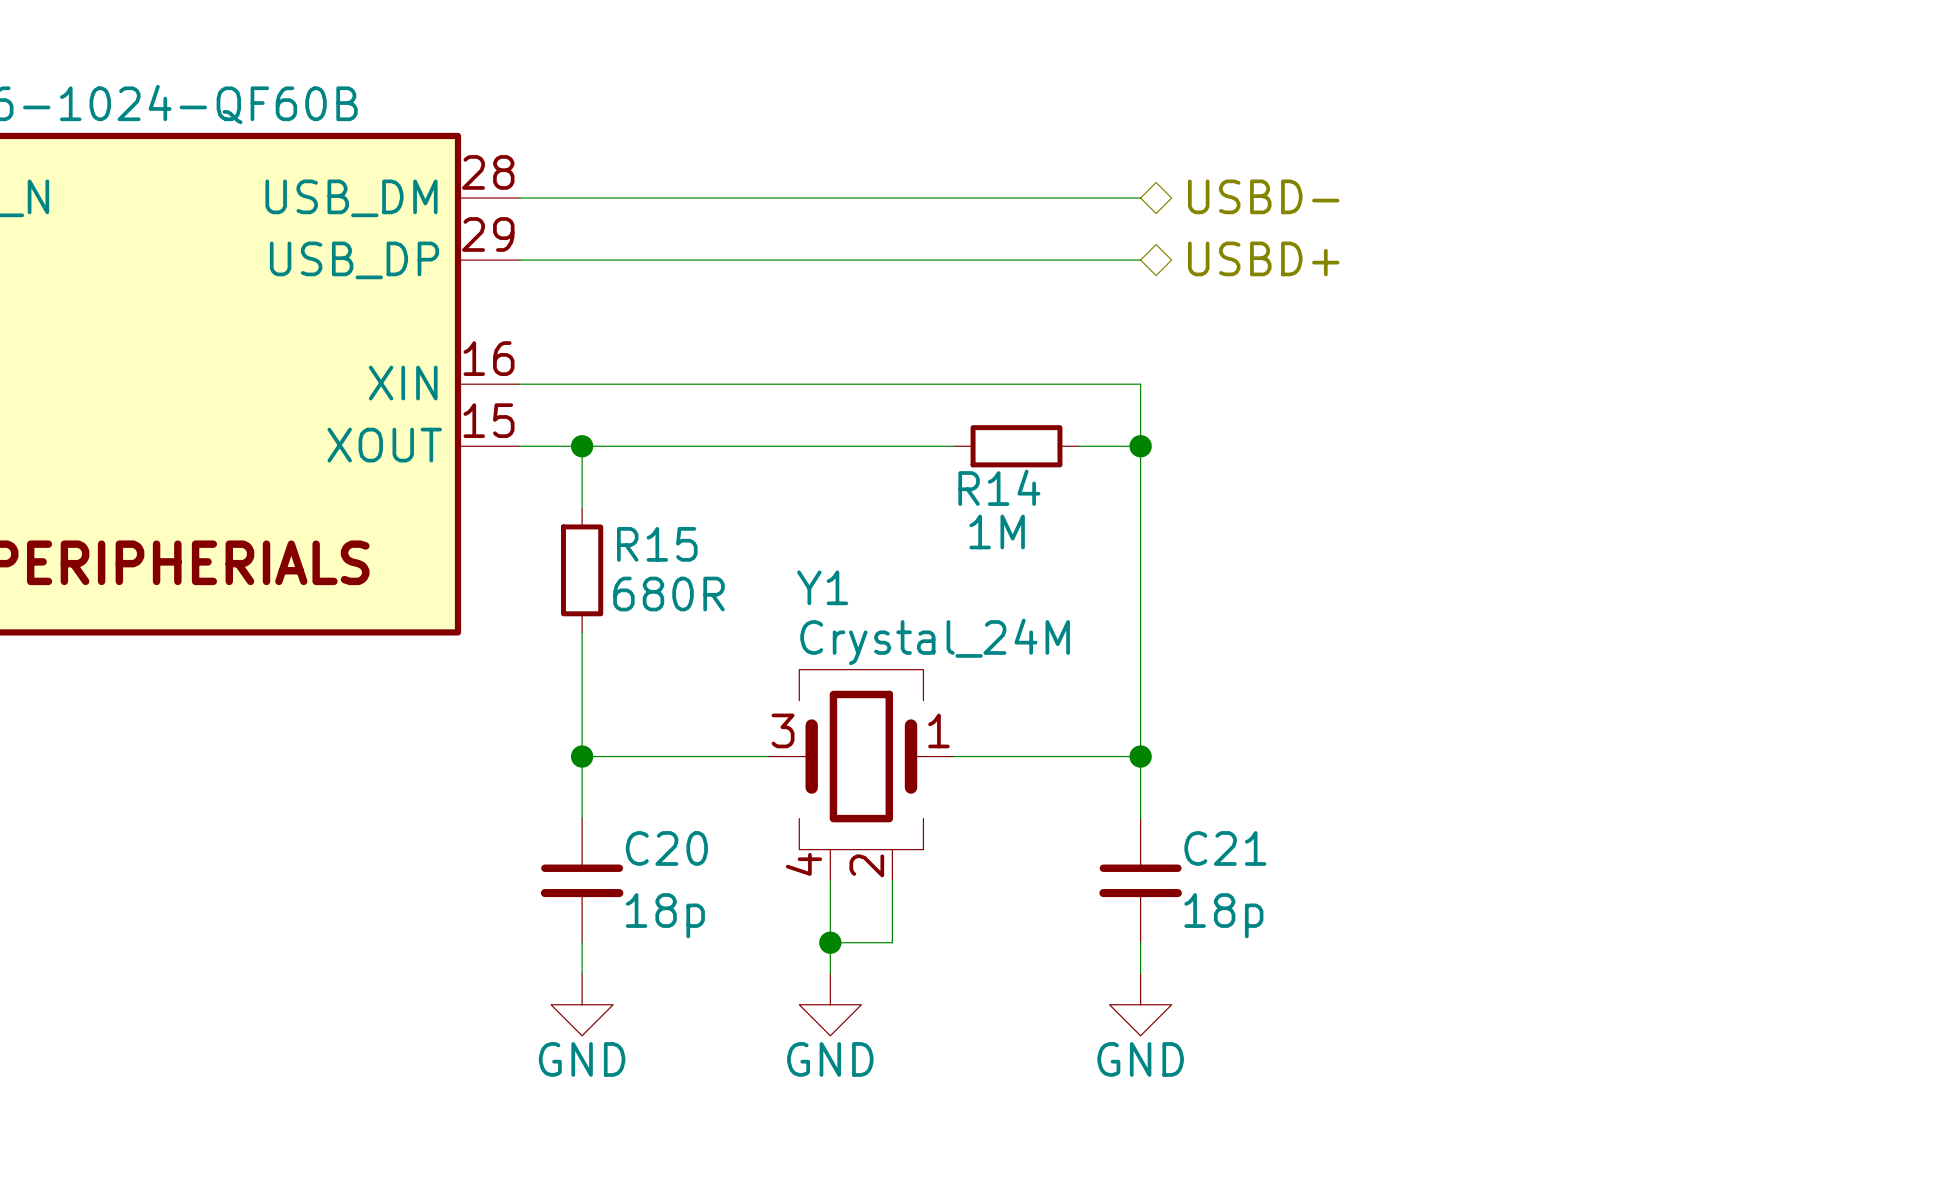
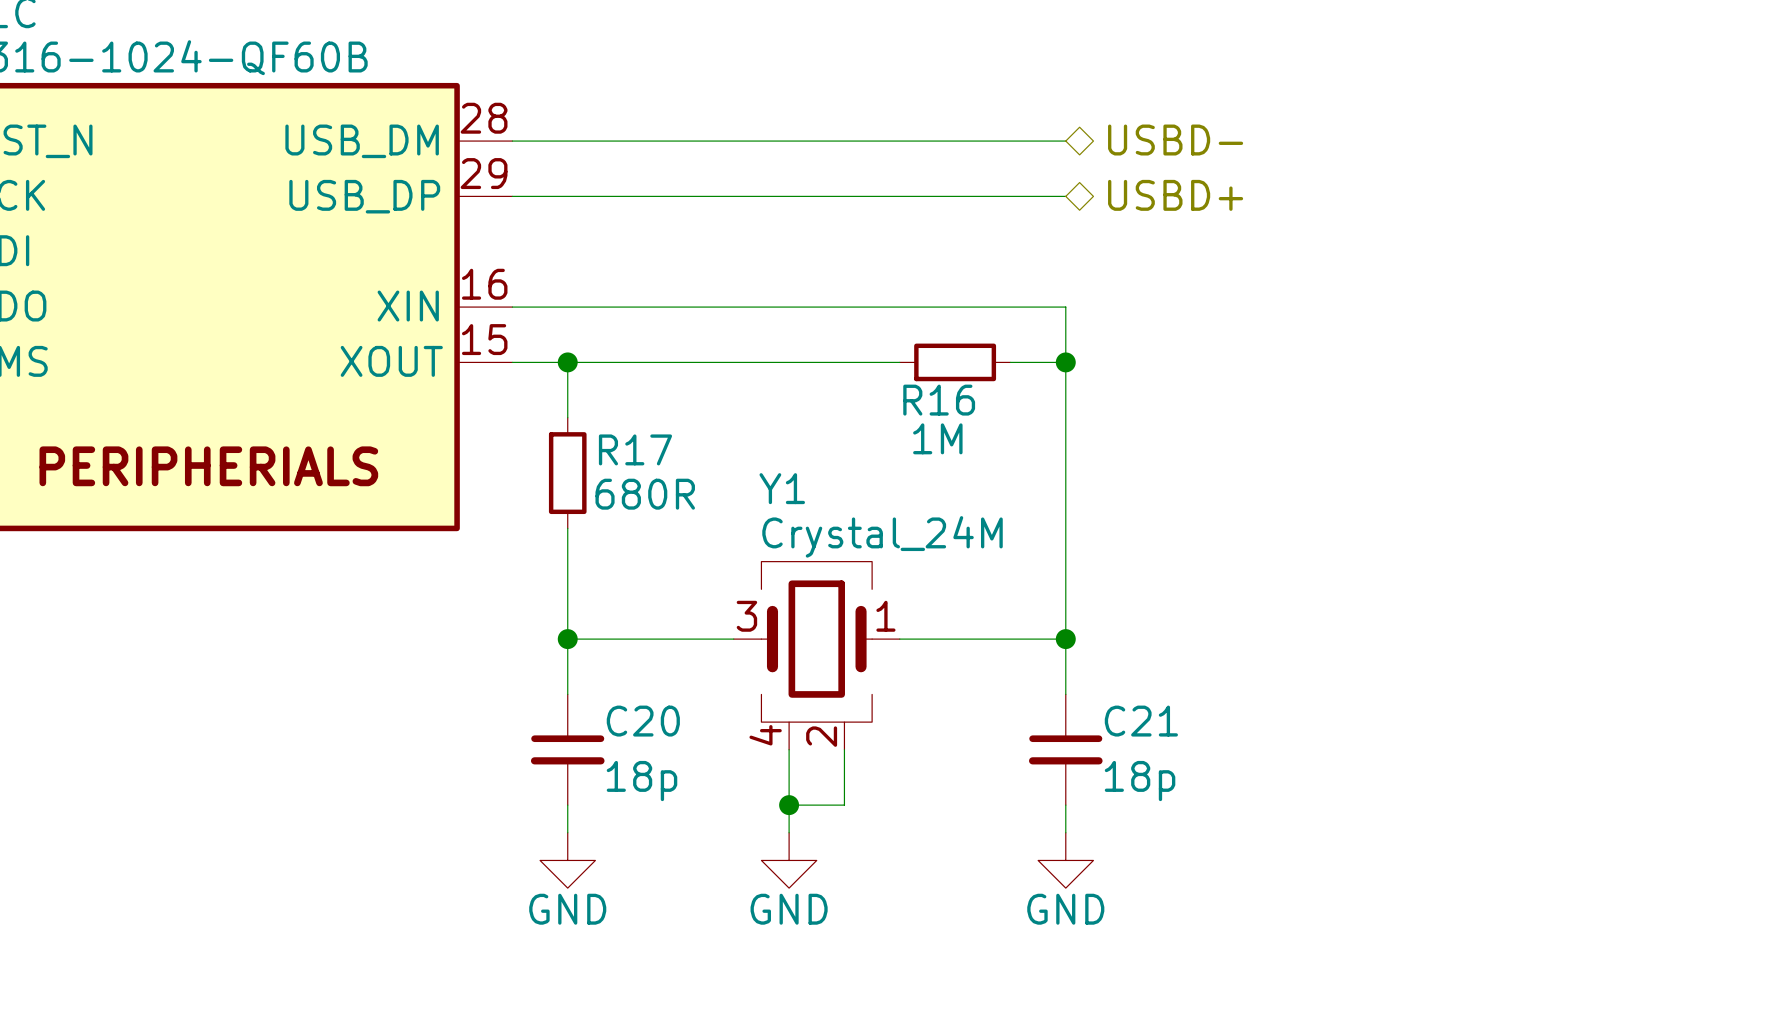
R14 name: R14 (999, 487) -> R16 (939, 400)
R15 name: R15 (657, 544) -> R17 (635, 449)

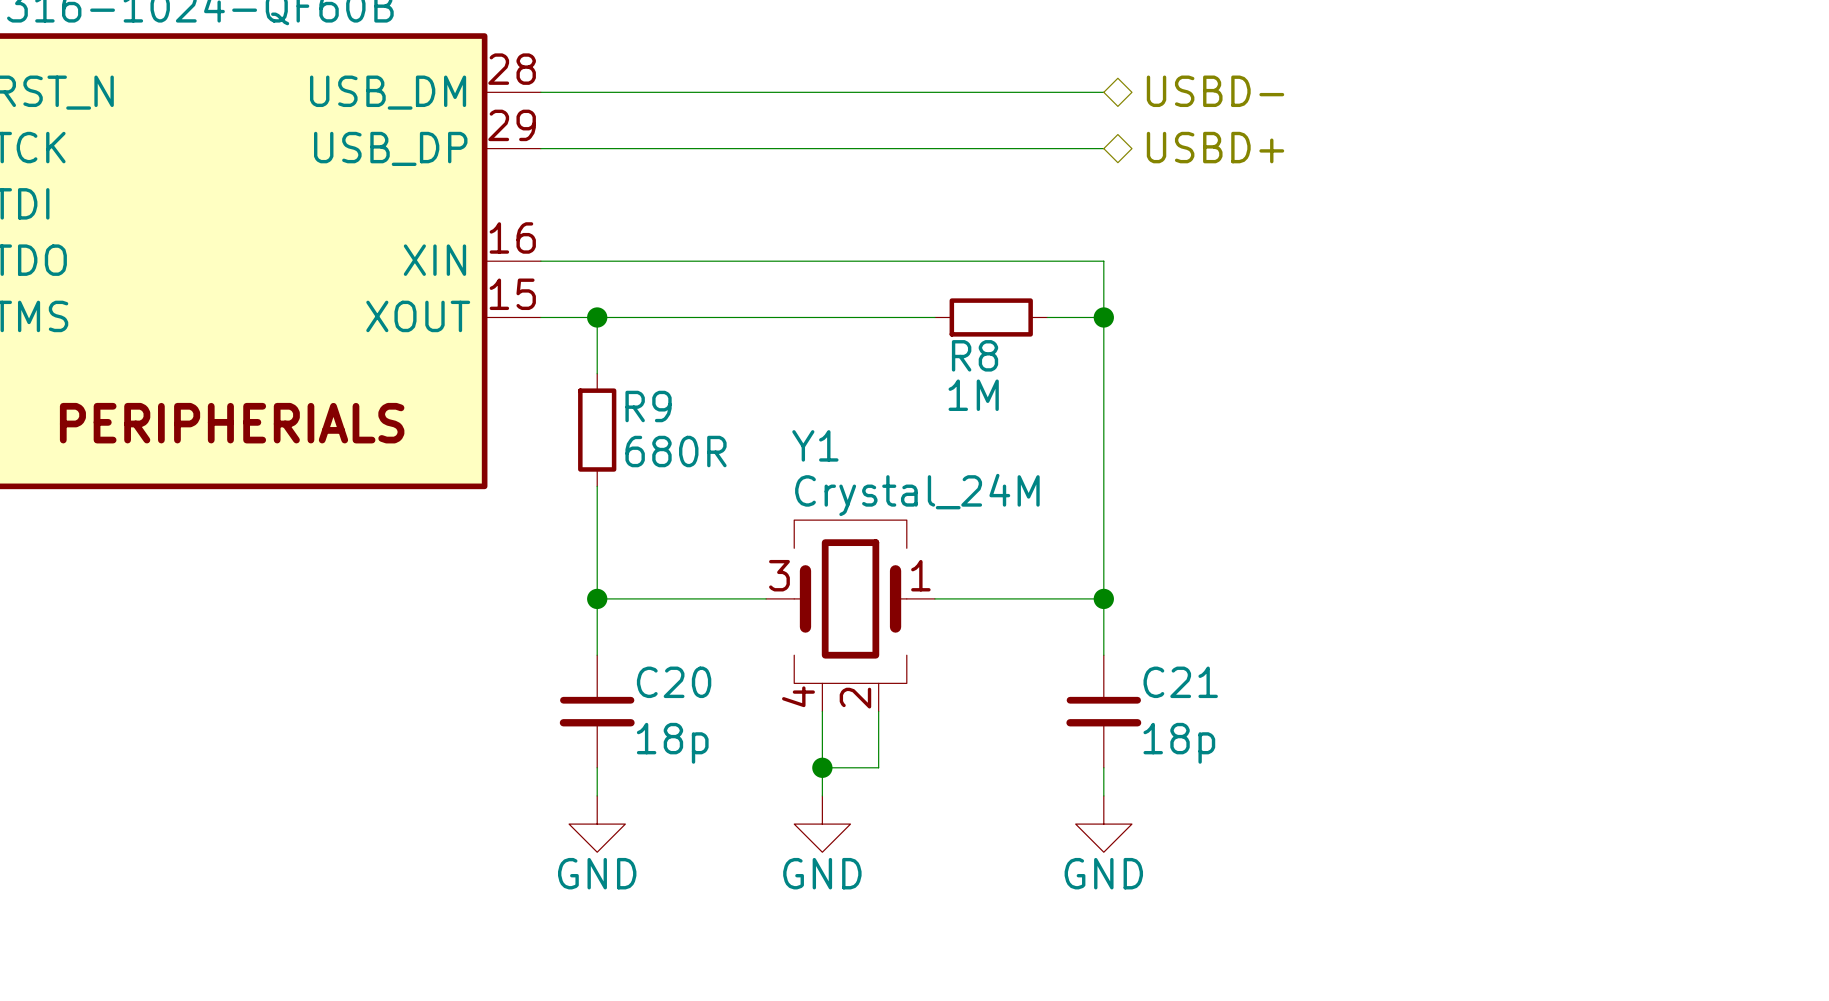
R16 name: R16 (939, 400) -> R8 (975, 355)
R17 name: R17 (635, 449) -> R9 (648, 406)

